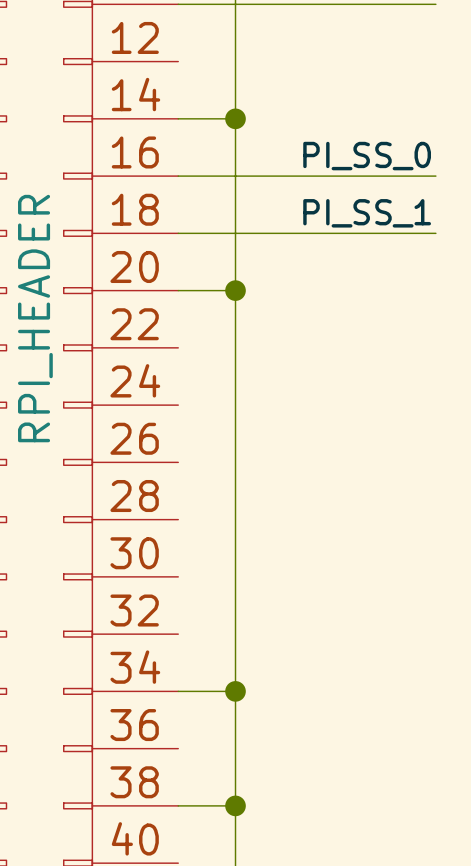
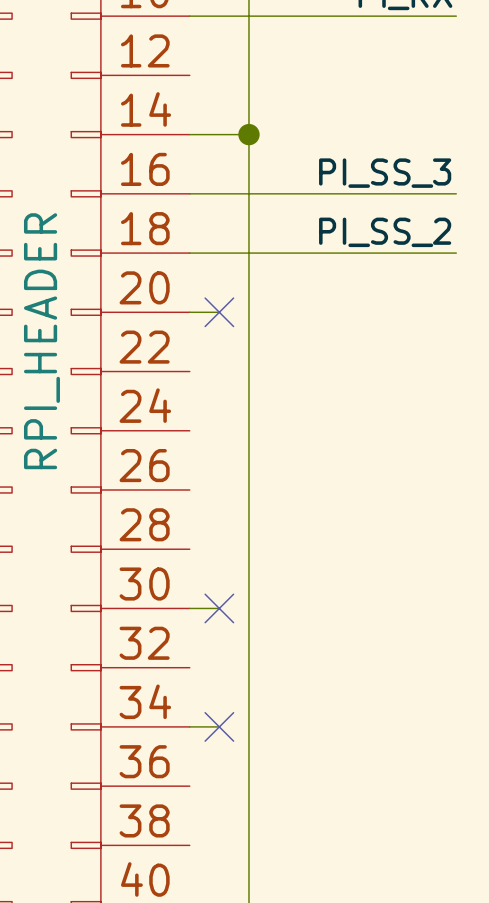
label: PI_SS_0 (367, 156) -> PI_SS_3 (385, 173)
label: PI_SS_1 (367, 213) -> PI_SS_2 (385, 232)
wire: (206, 290) (235, 290) -> none
no-connect mark: none -> (219, 312)
junction: (235, 290) -> none
no-connect mark: none -> (219, 608)
wire: (206, 691) (235, 691) -> (189, 608) (219, 608)
no-connect mark: none -> (219, 726)
junction: (235, 691) -> none
wire: (178, 805) (235, 805) -> none
junction: (235, 805) -> none

